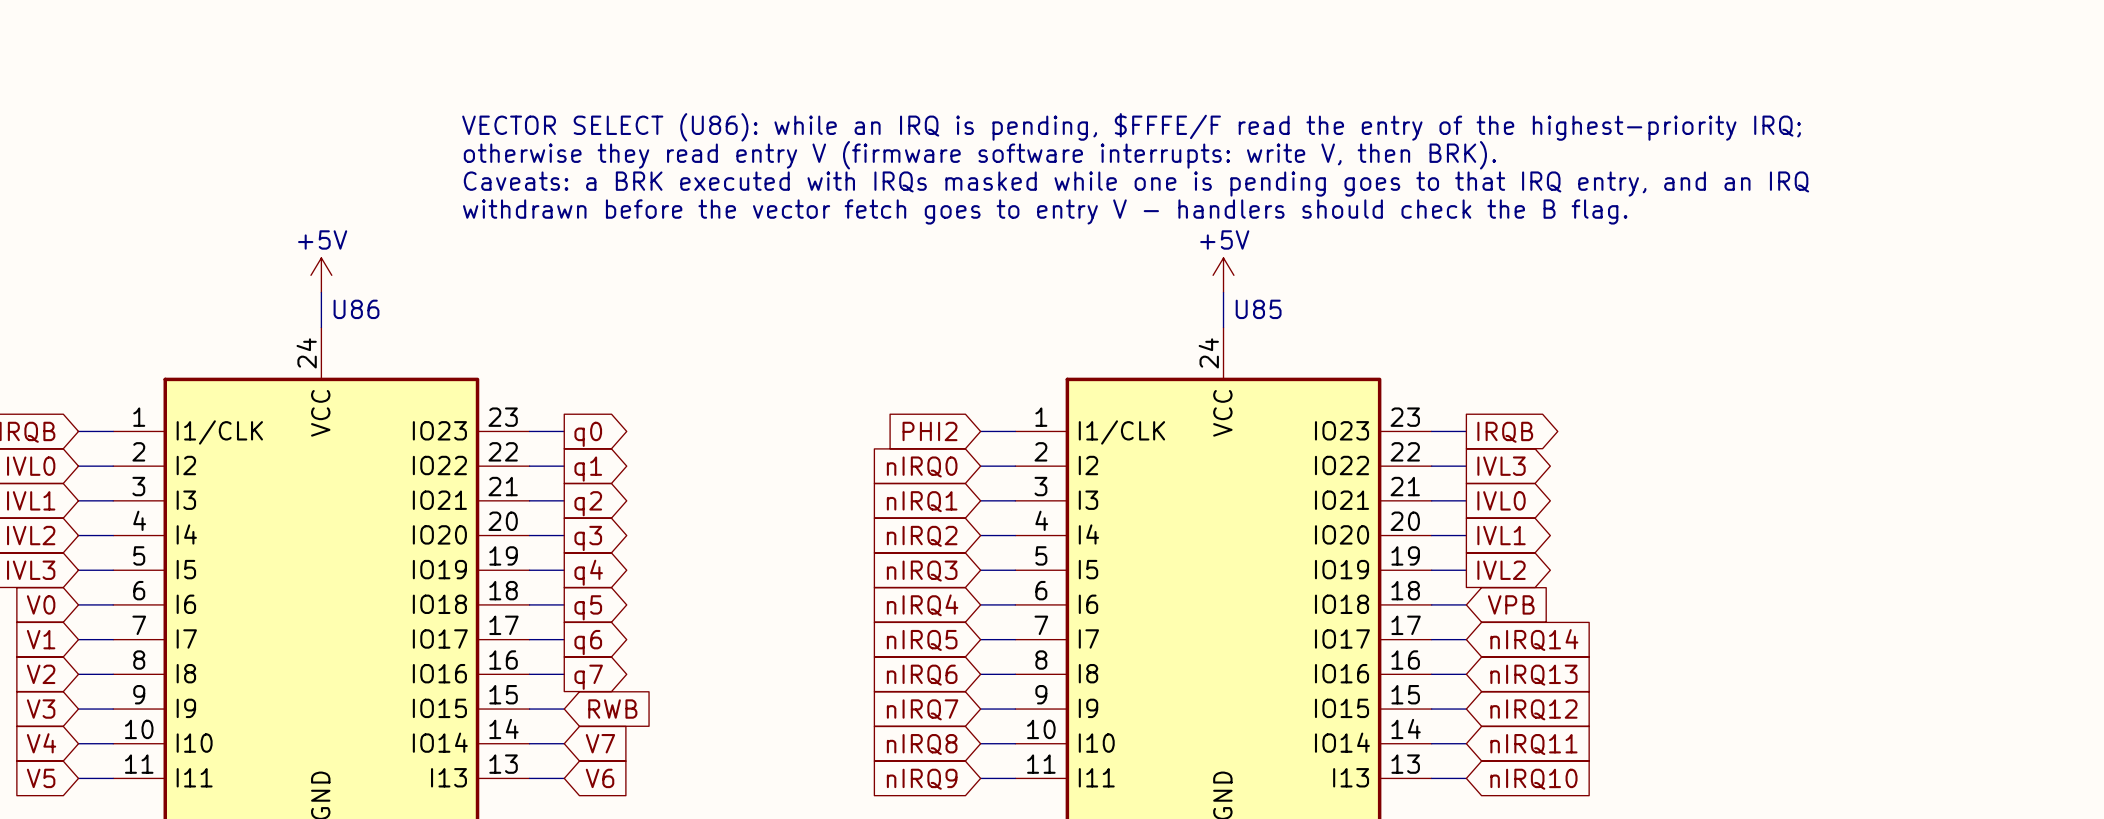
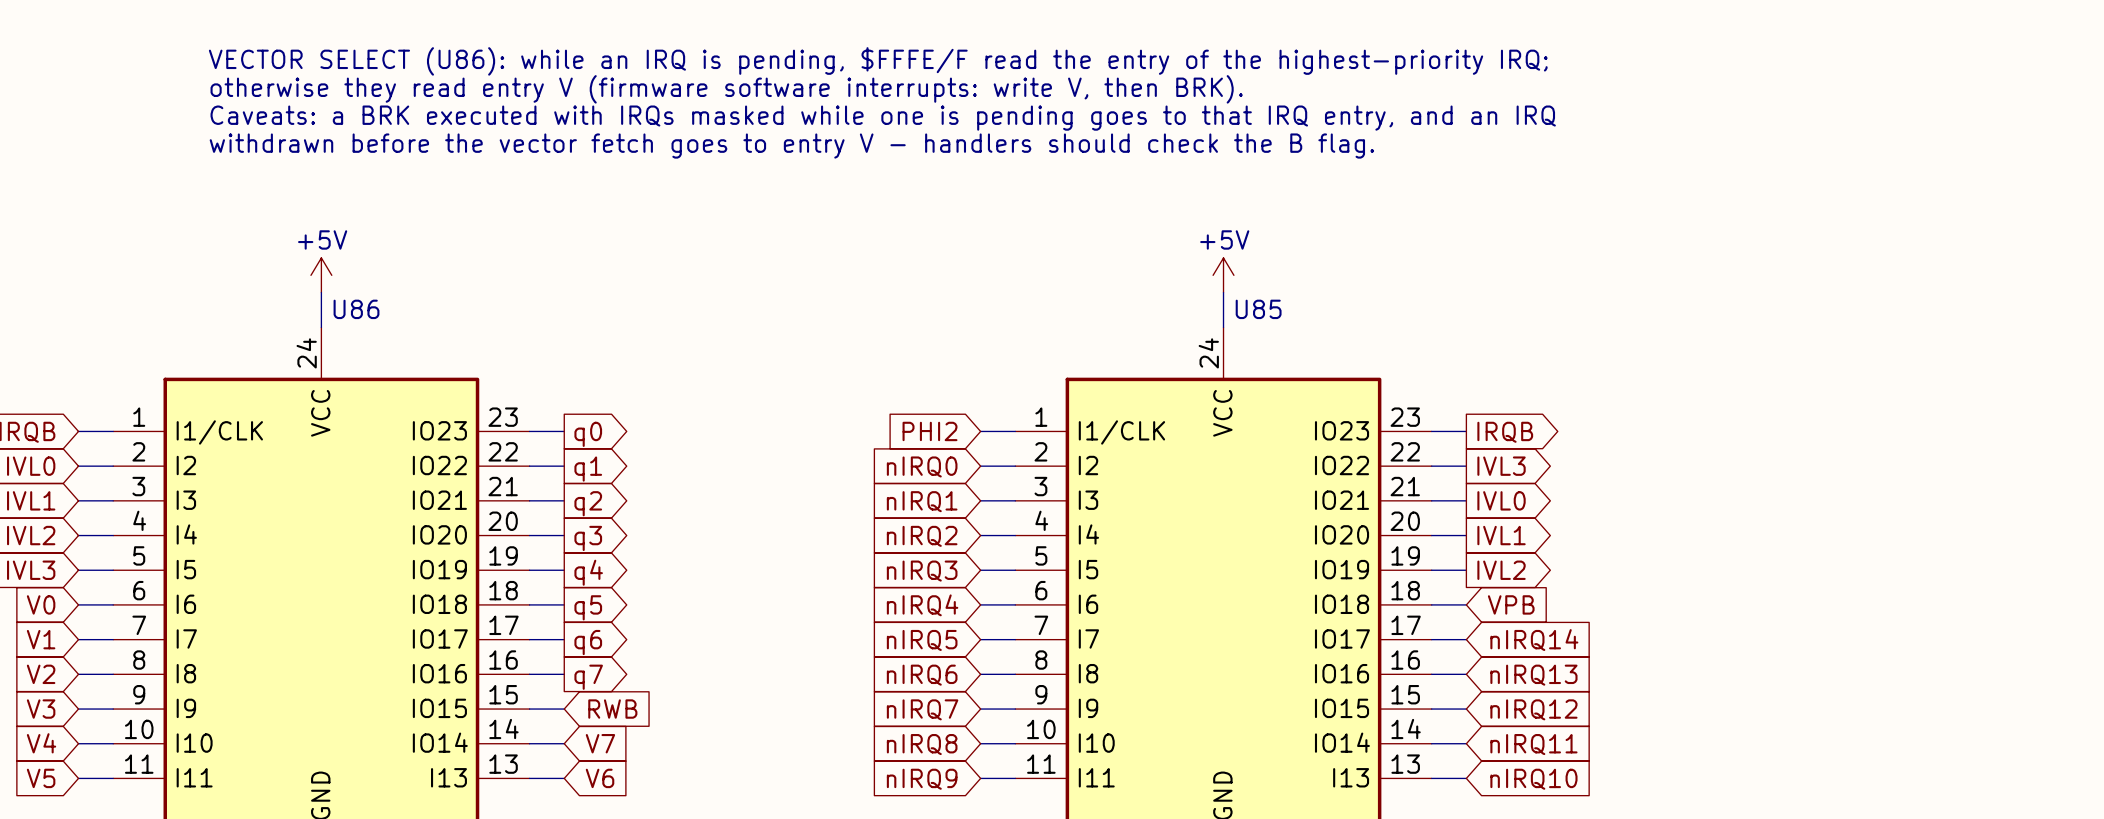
text position: VECTOR SELECT (U86): while an IRQ is pending, $FFFE/F read the entry of the highest-priority IRQ; (1131, 127) -> VECTOR SELECT (U86): while an IRQ is pending, $FFFE/F read the entry of the highest-priority IRQ; (878, 61)
text position: otherwise they read entry V (firmware software interrupts: write V, then BRK). (979, 155) -> otherwise they read entry V (firmware software interrupts: write V, then BRK). (726, 89)
text position: Caveats: a BRK executed with IRQs masked while one is pending goes to that IRQ entry, and an IRQ (1136, 184) -> Caveats: a BRK executed with IRQs masked while one is pending goes to that IRQ entry, and an IRQ (883, 118)
text position: withdrawn before the vector fetch goes to entry V - handlers should check the B flag. (1045, 211) -> withdrawn before the vector fetch goes to entry V - handlers should check the B flag. (791, 146)

